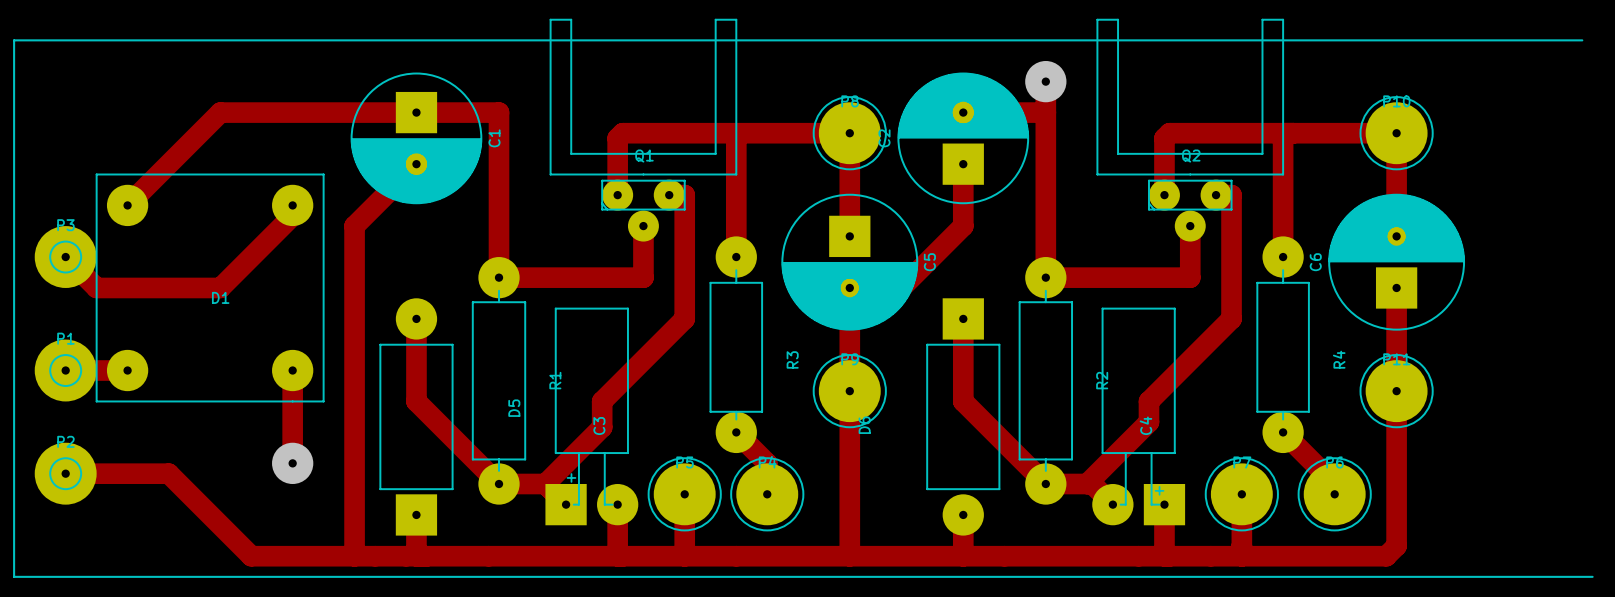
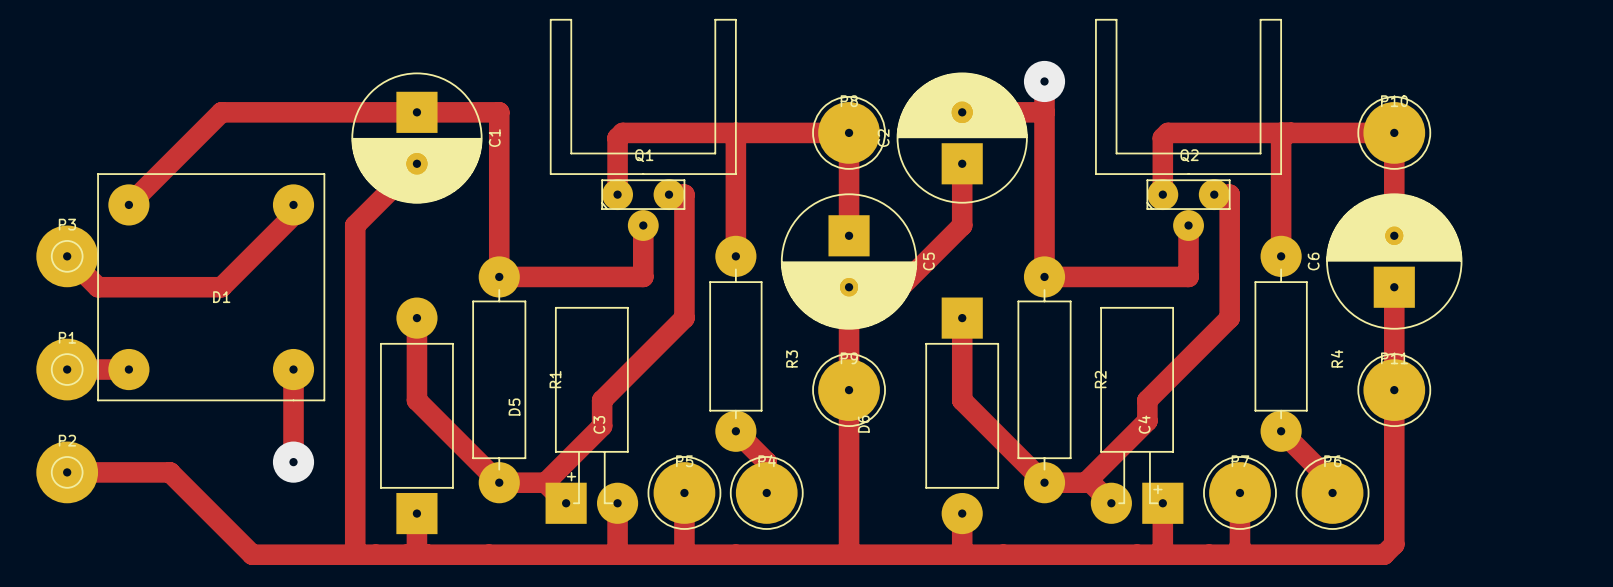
line: (1582, 40) (14, 40) (14, 576) (1592, 576) -> none

